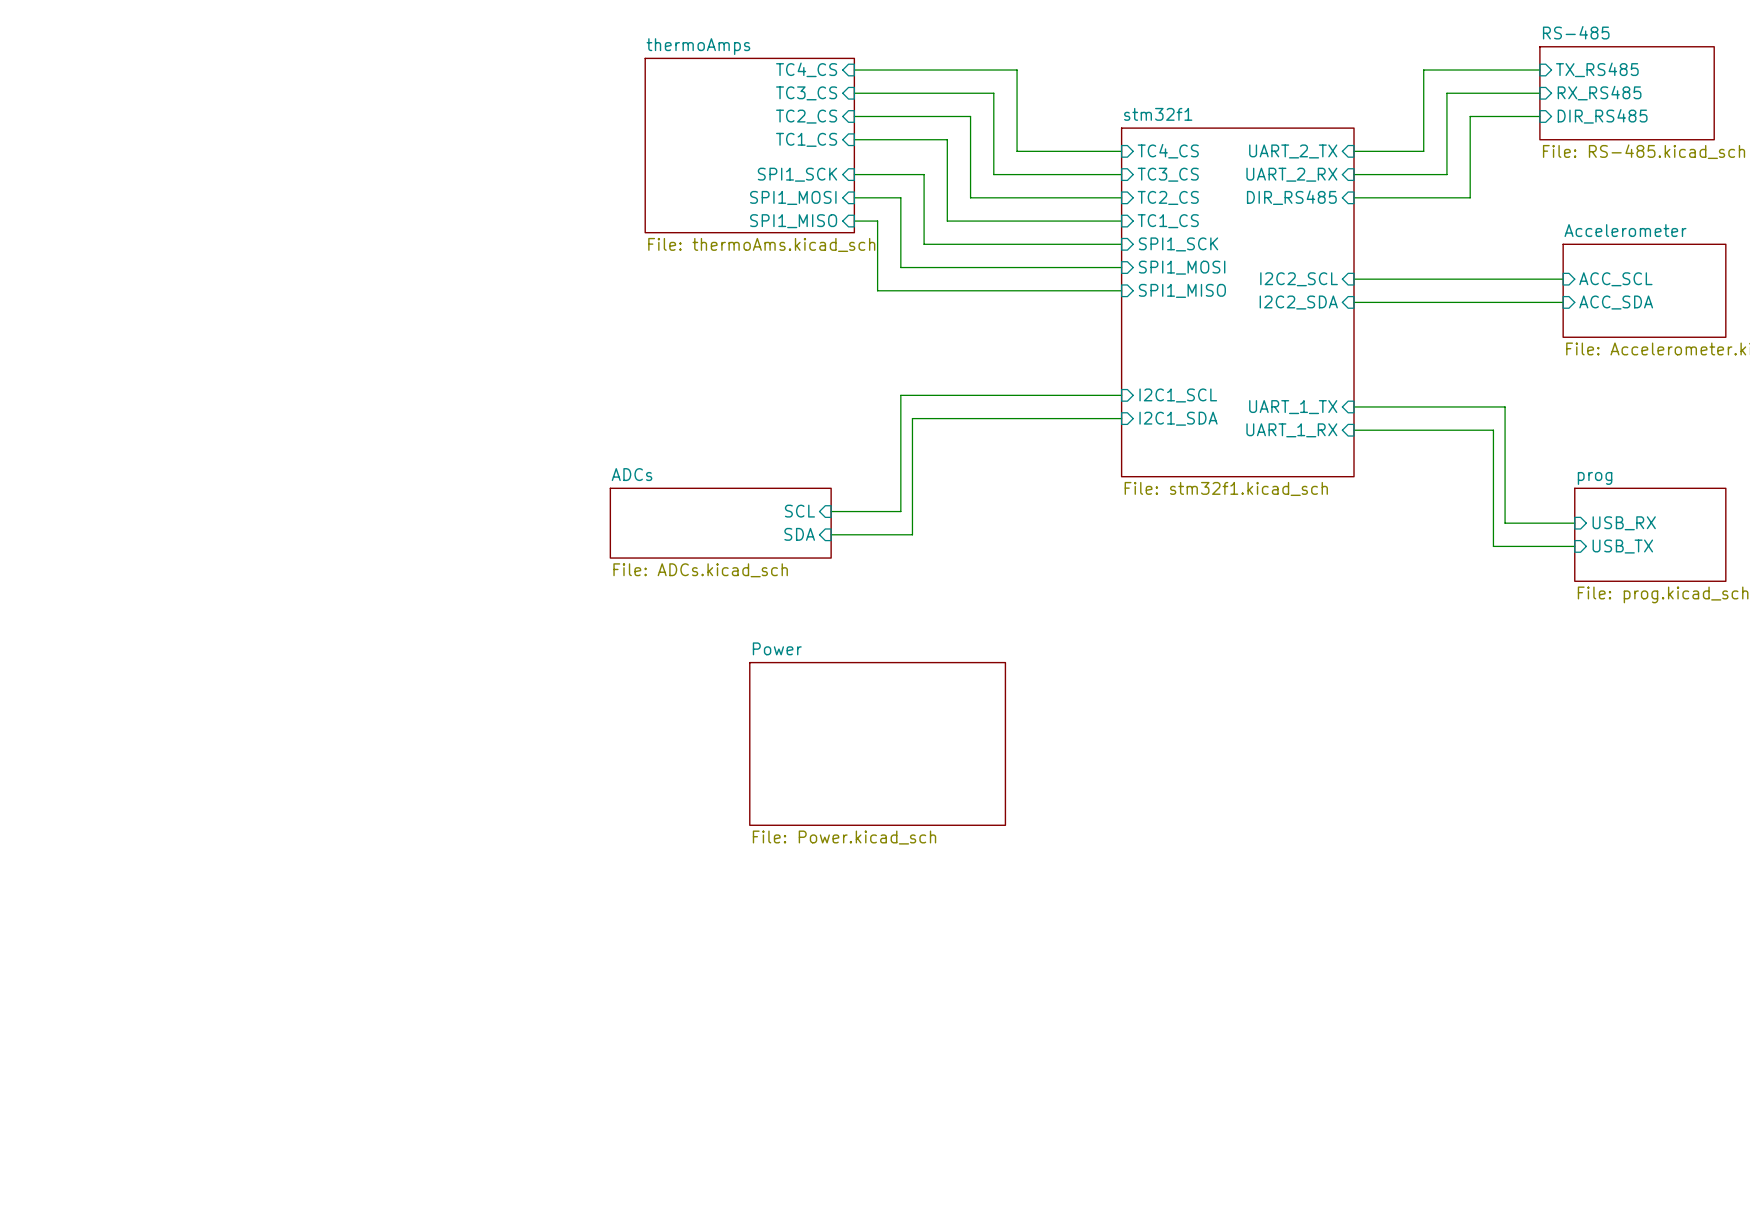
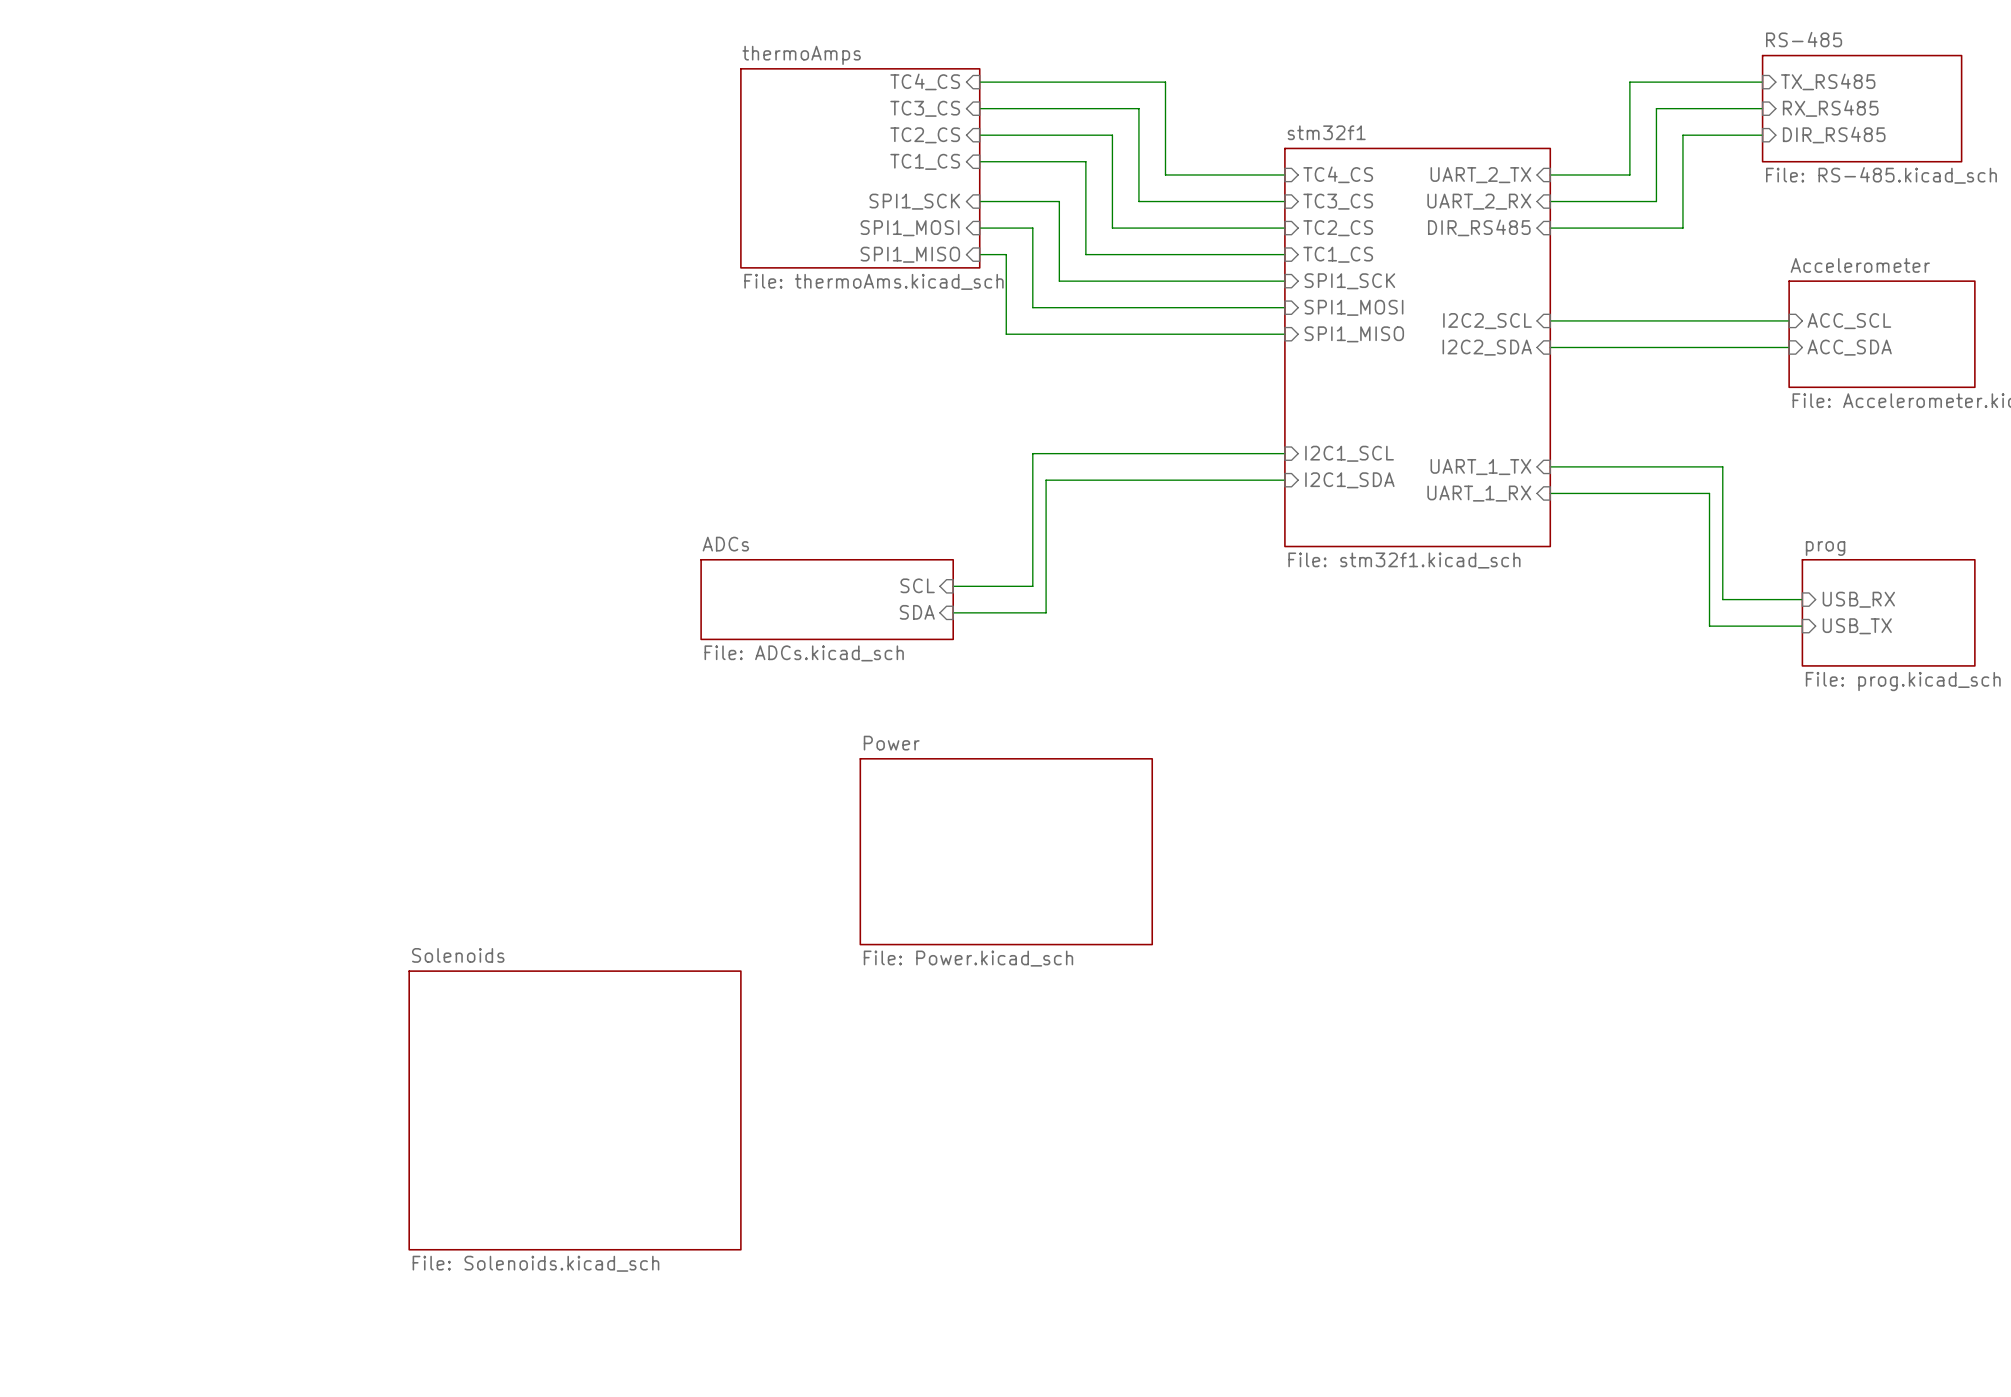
sheet Solenoids: none -> File: Solenoids.kicad_sch (575, 1110)

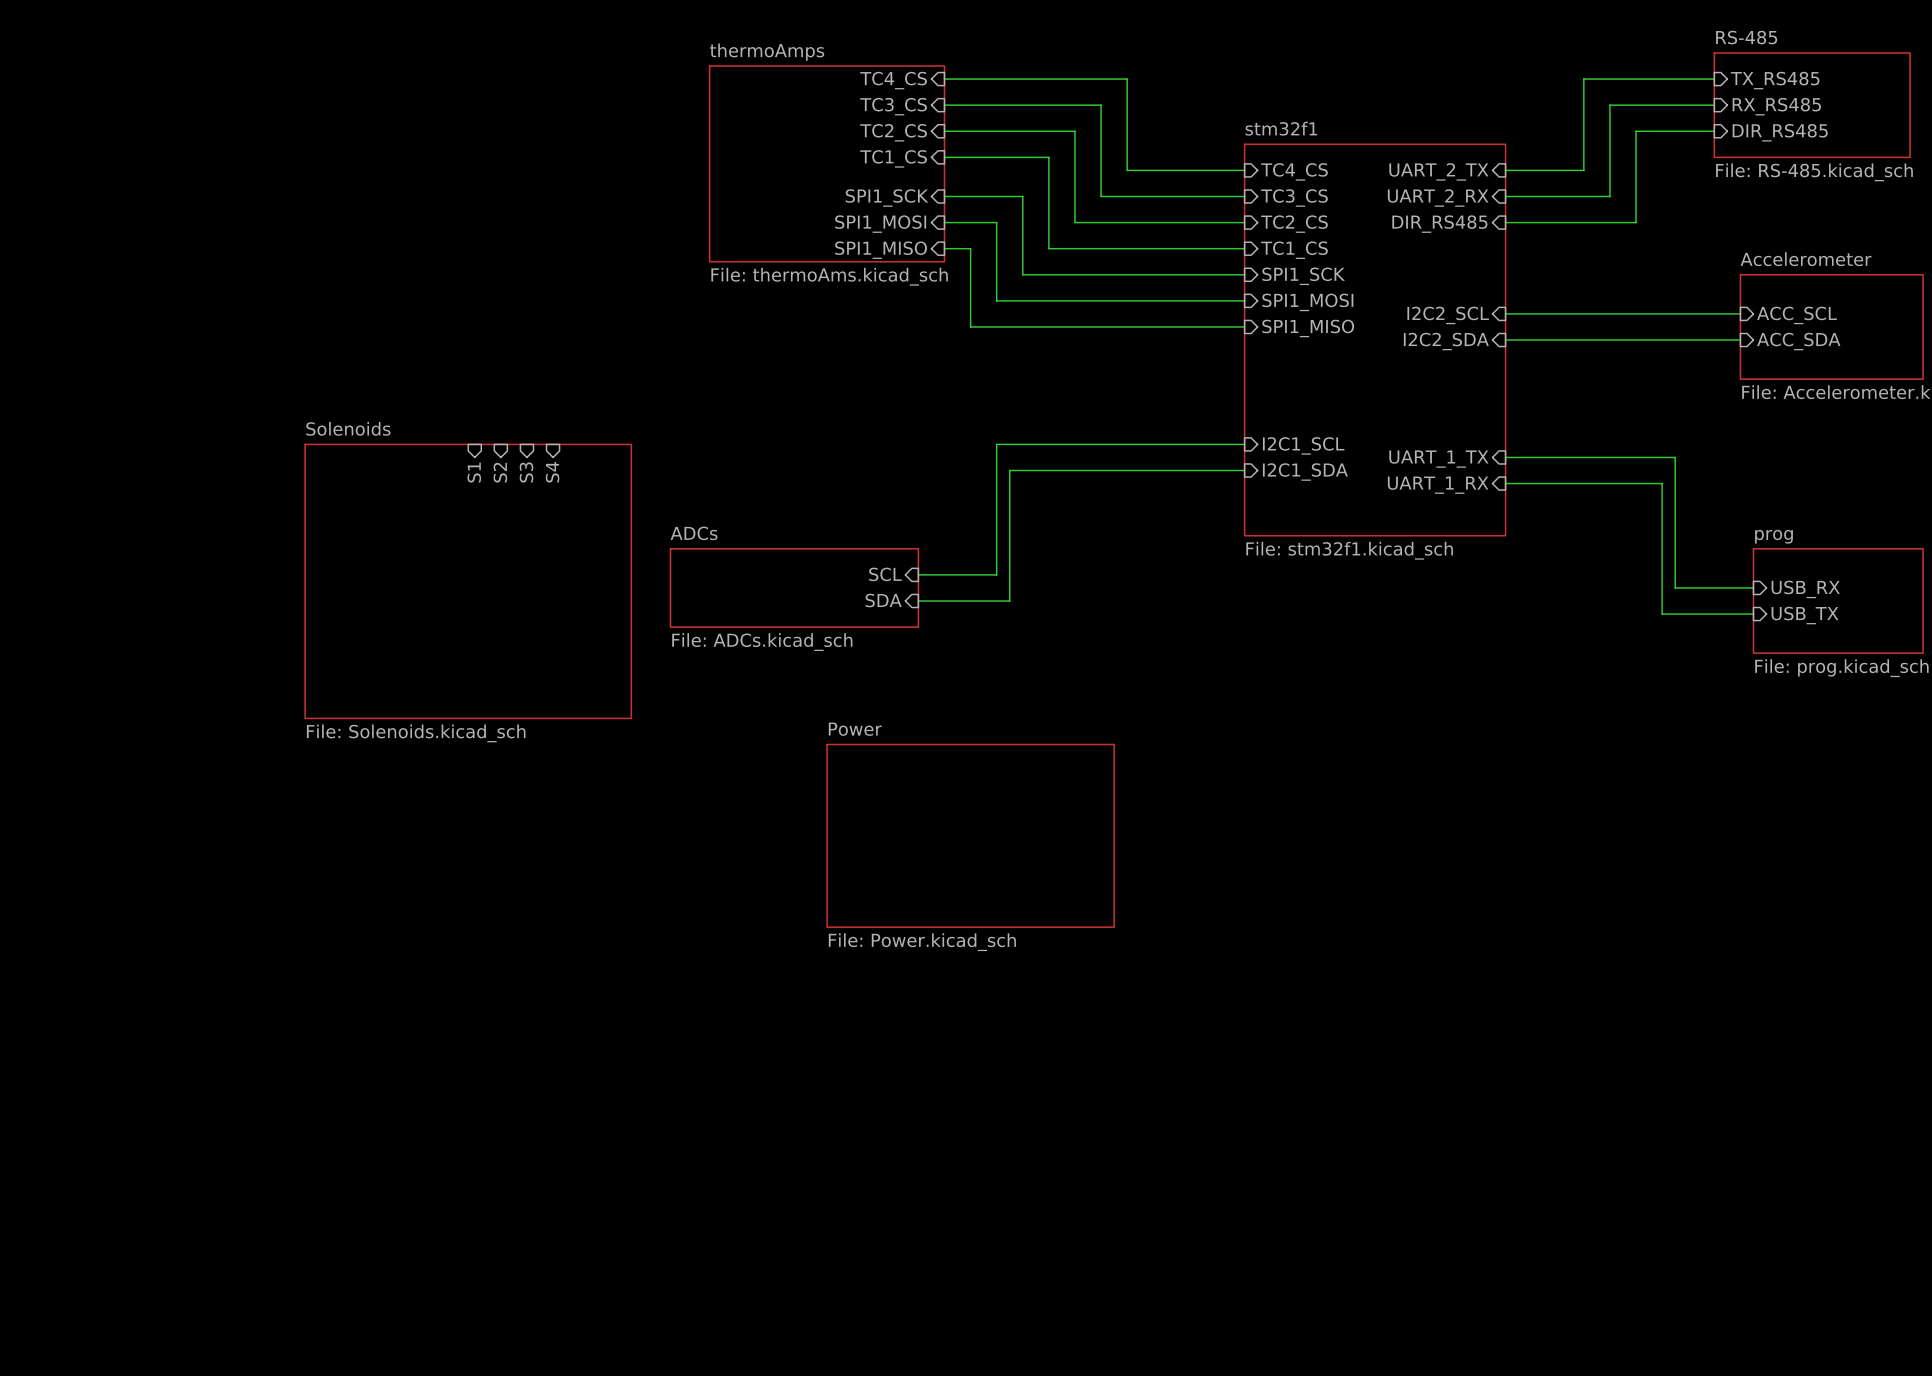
sheet pin: none -> S4 (552, 472)
sheet pin: none -> S1 (474, 472)
sheet pin: none -> S2 (500, 472)
sheet pin: none -> S3 (526, 472)
sheet Solenoids: none -> File: Solenoids.kicad_sch (468, 581)
sheet Solenoids: File: Solenoids.kicad_sch (575, 1110) -> none

